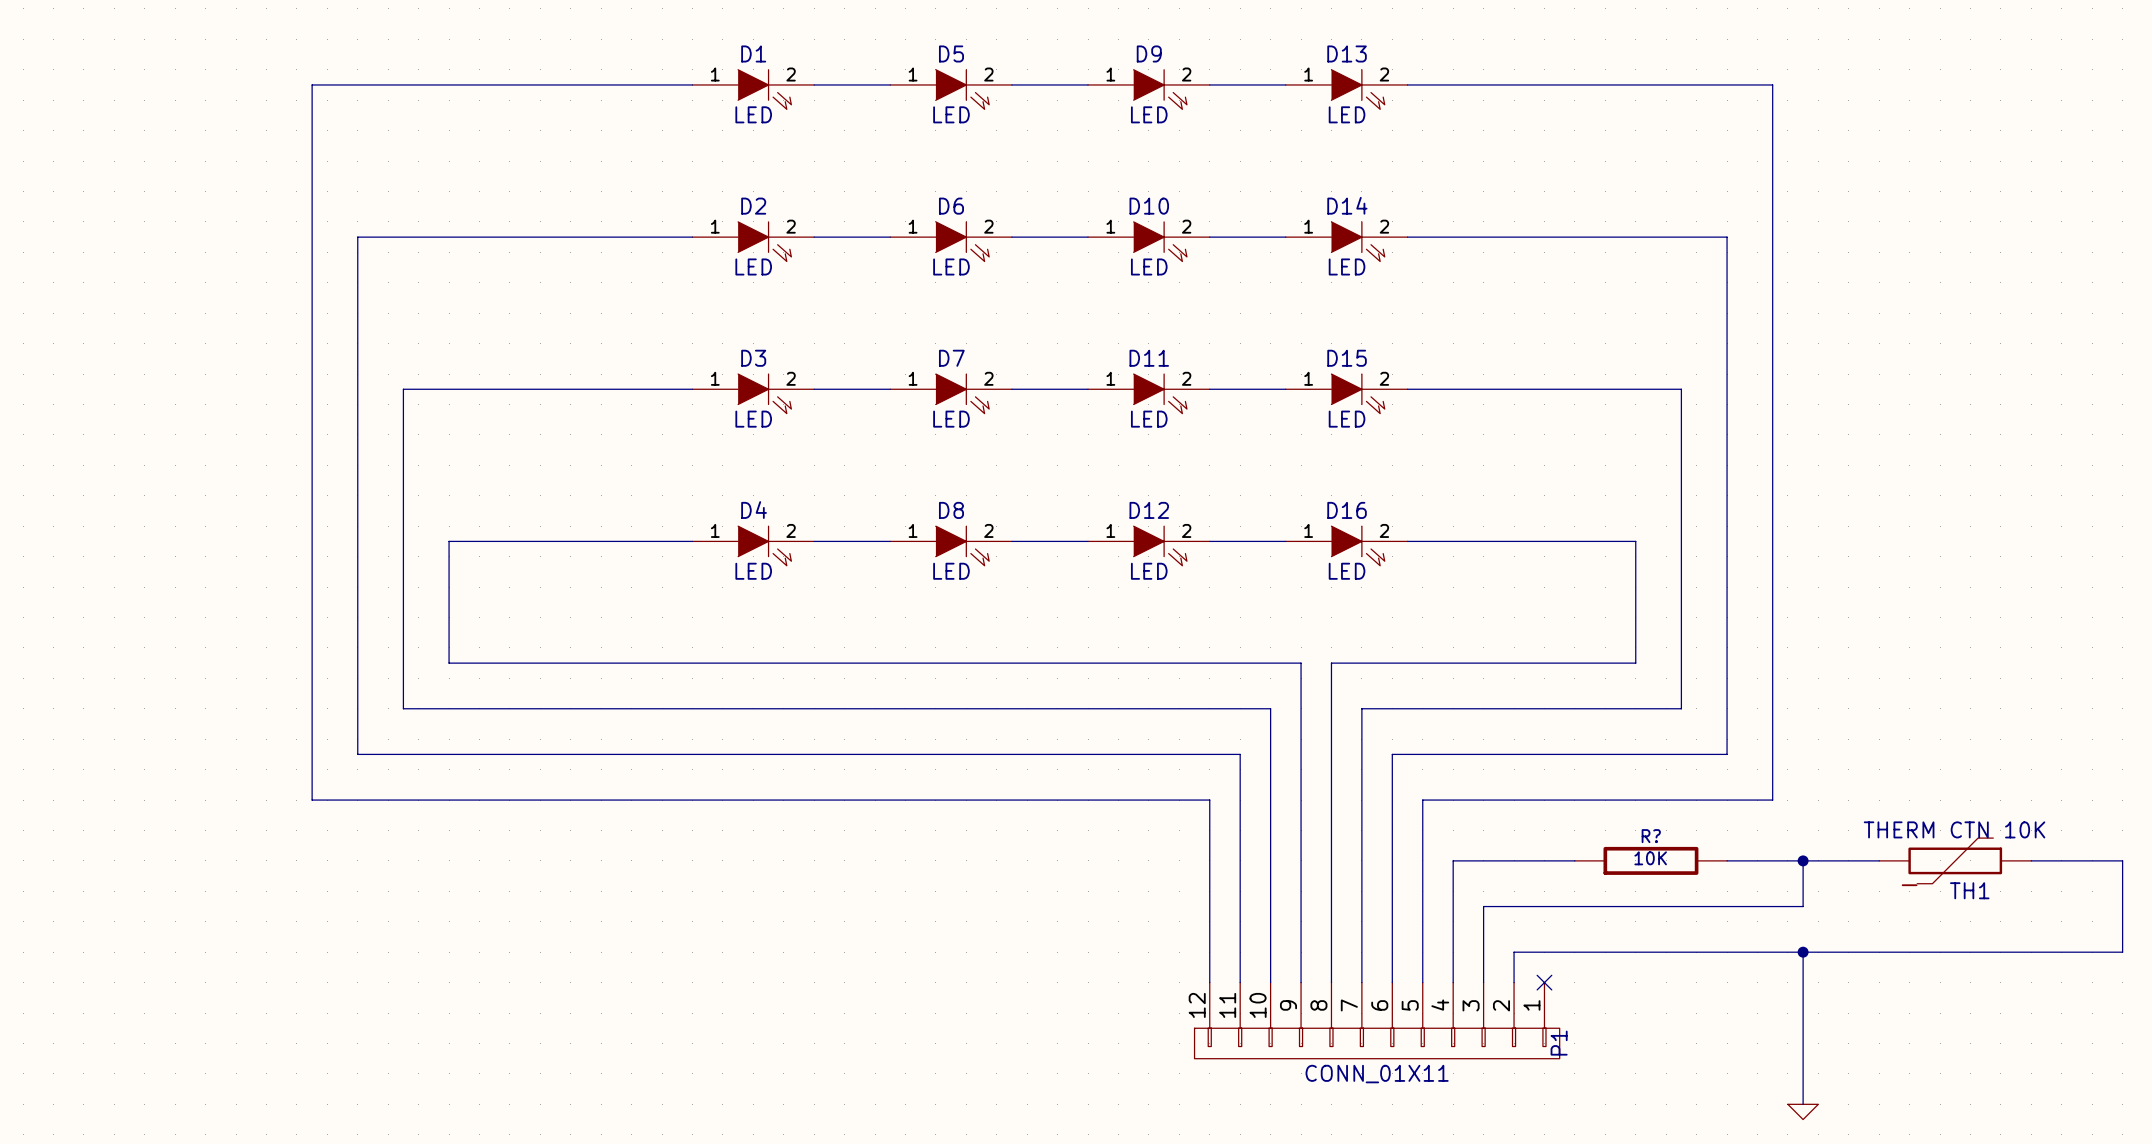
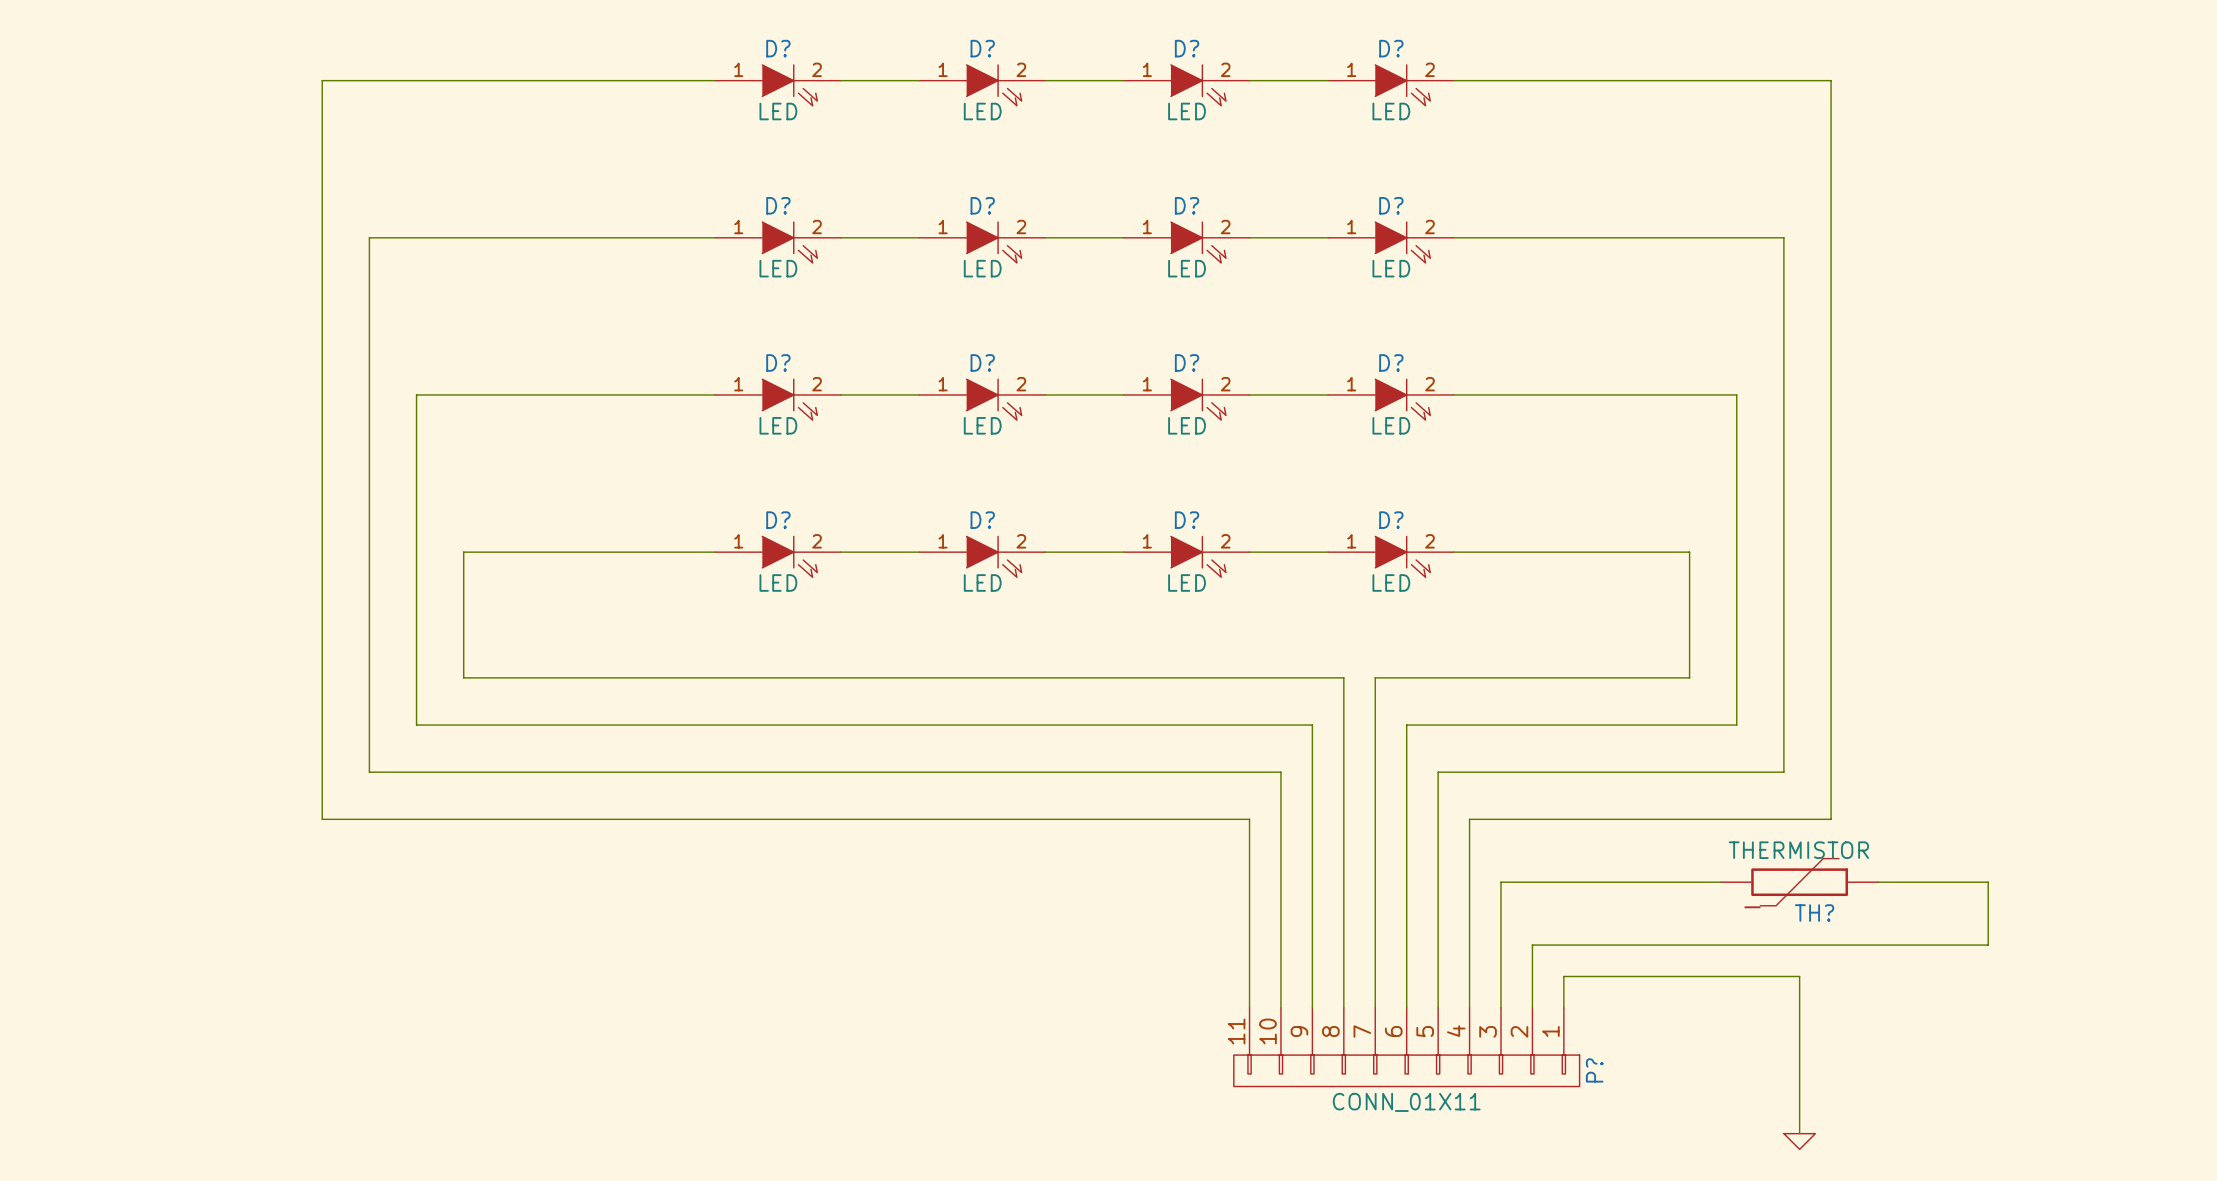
D1 name: D1 (753, 53) -> D? (778, 48)
D5 name: D5 (951, 53) -> D? (982, 48)
D9 name: D9 (1149, 53) -> D? (1187, 48)
D13 name: D13 (1347, 53) -> D? (1391, 48)
D14 name: D14 (1347, 205) -> D? (1391, 205)
D2 name: D2 (753, 206) -> D? (778, 205)
D6 name: D6 (951, 206) -> D? (982, 205)
D10 name: D10 (1149, 206) -> D? (1187, 205)
D3 name: D3 (753, 358) -> D? (778, 362)
D7 name: D7 (951, 358) -> D? (982, 362)
D11 name: D11 (1149, 358) -> D? (1187, 362)
D15 name: D15 (1347, 358) -> D? (1391, 362)
D4 name: D4 (754, 510) -> D? (778, 520)
D8 name: D8 (951, 510) -> D? (982, 520)
D12 name: D12 (1149, 510) -> D? (1187, 520)
D16 name: D16 (1347, 510) -> D? (1391, 520)
R?: 10K (1650, 860) -> none
wire: (1727, 860) (1818, 860) -> (1626, 882) (1721, 882)
TH?: none -> THERMISTOR (1799, 882)
wire: (1803, 860) (1803, 906) (1483, 906) (1483, 921) -> (1941, 882) (1988, 882) (1988, 945) (1532, 945)
junction: (1803, 860) -> none
TH1: THERM CTN 10K (1955, 860) -> none
wire: (2031, 860) (2122, 860) (2122, 952) (1742, 952) -> (1799, 1133) (1799, 976)
wire: (1803, 952) (1803, 1104) -> none
junction: (1803, 952) -> none
no-connect mark: (1544, 982) -> none
P?: none -> CONN_01X11 (1406, 1047)
P1: CONN_01X11 (1377, 1020) -> none
power symbol position: (1803, 1111) -> (1799, 1141)

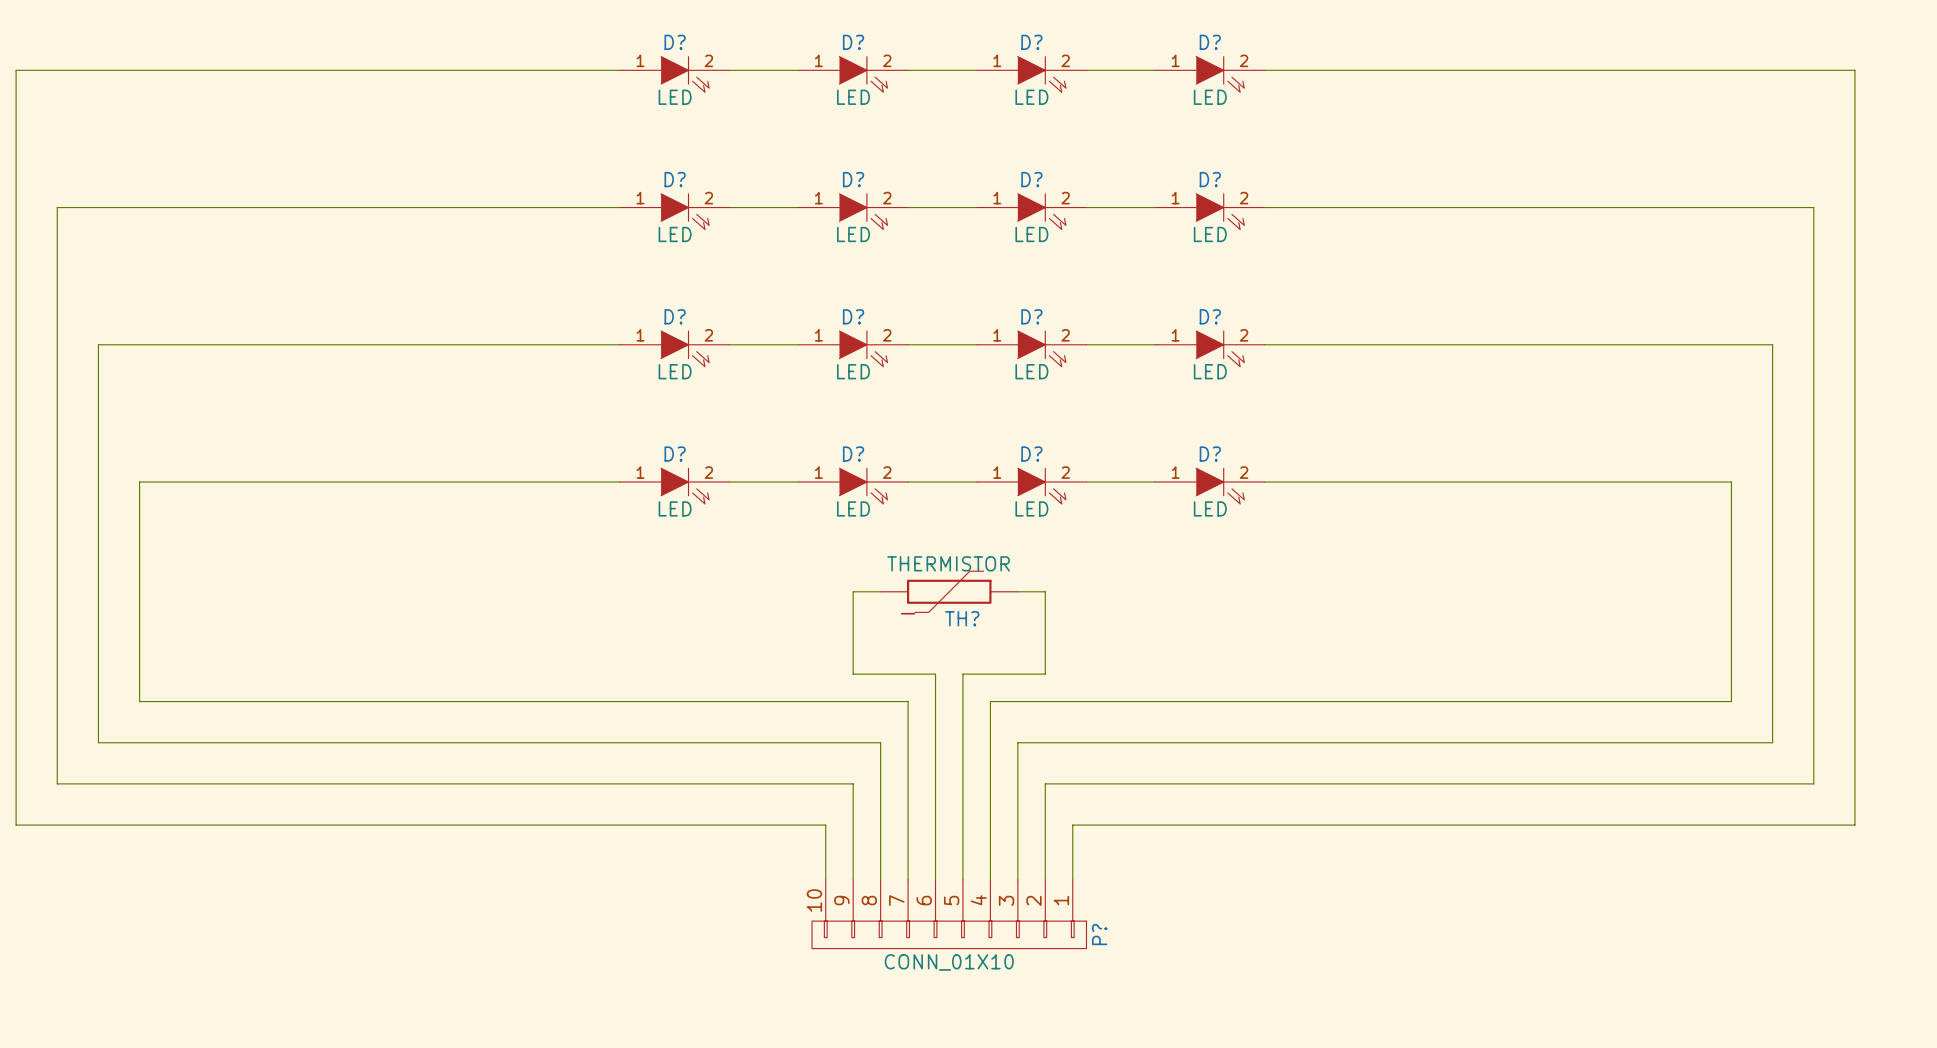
wire: (322, 80) (322, 819) (1249, 819) (1249, 1007) -> (276, 70) (16, 70) (16, 825) (825, 825) (825, 879)
wire: (1831, 80) (1831, 819) (1469, 819) (1469, 1007) -> (1594, 70) (1854, 70) (1854, 825) (1731, 825)
wire: (369, 237) (369, 772) (982, 772) -> (318, 207) (57, 207) (57, 783) (853, 783) (853, 879)
wire: (1783, 237) (1783, 772) (1438, 772) (1438, 1007) -> (1553, 207) (1813, 207) (1813, 783) (1045, 783) (1045, 879)
wire: (416, 394) (416, 725) (1312, 725) (1312, 1007) -> (359, 344) (98, 344) (98, 742) (880, 742) (880, 879)
wire: (1736, 394) (1736, 725) (1406, 725) (1406, 1007) -> (1511, 344) (1772, 344) (1772, 742) (1017, 742) (1017, 879)
wire: (463, 552) (463, 677) (982, 677) -> (400, 482) (139, 482) (139, 701) (908, 701) (908, 879)
wire: (1689, 552) (1689, 677) (1375, 677) (1375, 1007) -> (1470, 482) (1731, 482) (1731, 701) (990, 701) (990, 879)
wire: none -> (853, 591) (853, 674)
wire: (1013, 677) (1170, 677) -> none
TH?: none -> THERMISTOR (949, 591)
wire: (1202, 677) (1343, 677) (1343, 1007) -> (1045, 591) (1045, 674)
wire: (1076, 772) (1108, 772) -> (935, 674) (935, 879)
wire: none -> (962, 674) (962, 879)
wire: (1202, 772) (1280, 772) (1280, 1007) -> none
wire: (1721, 882) (1501, 882) (1501, 1007) -> none
TH?: THERMISTOR (1799, 882) -> none
wire: (1878, 882) (1988, 882) (1988, 945) -> none
wire: (1532, 945) (1532, 1007) -> (1333, 825) (1072, 825) (1072, 879)
wire: (1563, 1007) (1563, 976) (1799, 976) (1799, 1133) -> none
P?: none -> CONN_01X10 (949, 914)
P?: CONN_01X11 (1406, 1047) -> none
power symbol: (1799, 1141) -> none

